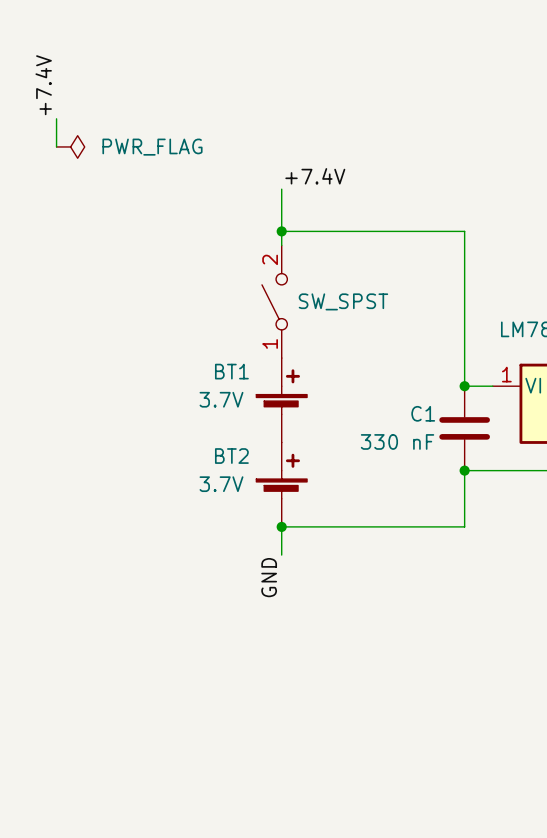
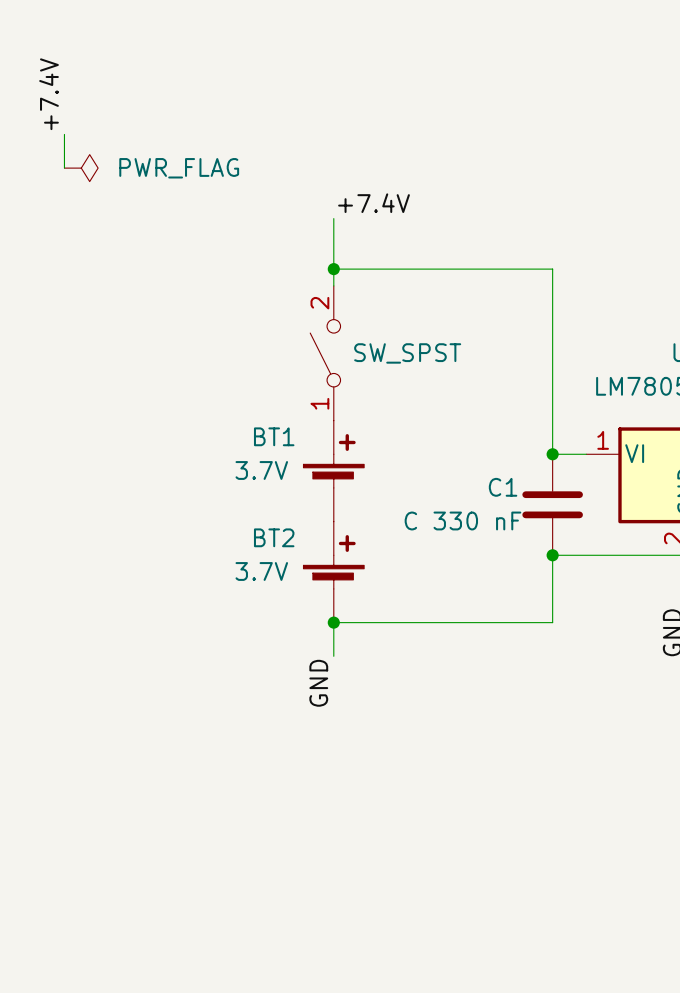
C1 value: 330 nF (397, 441) -> C 330 nF (462, 520)

